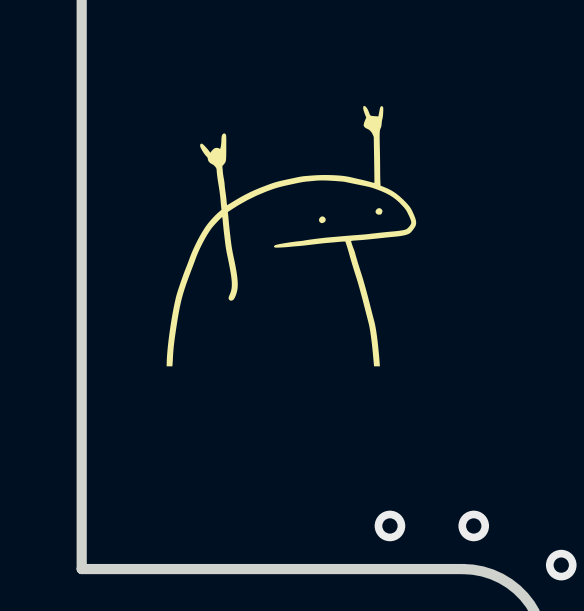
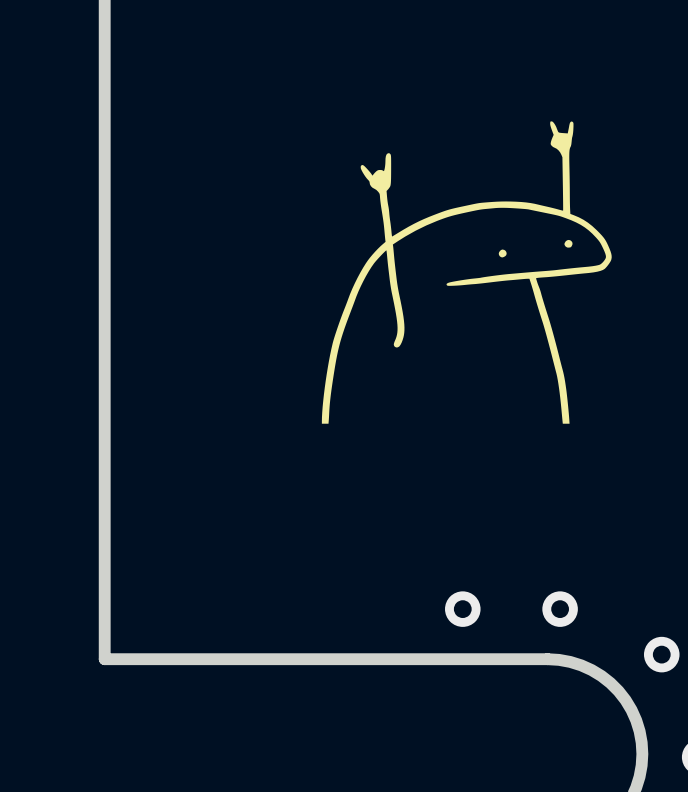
drawing position: (291, 236) -> (466, 272)

